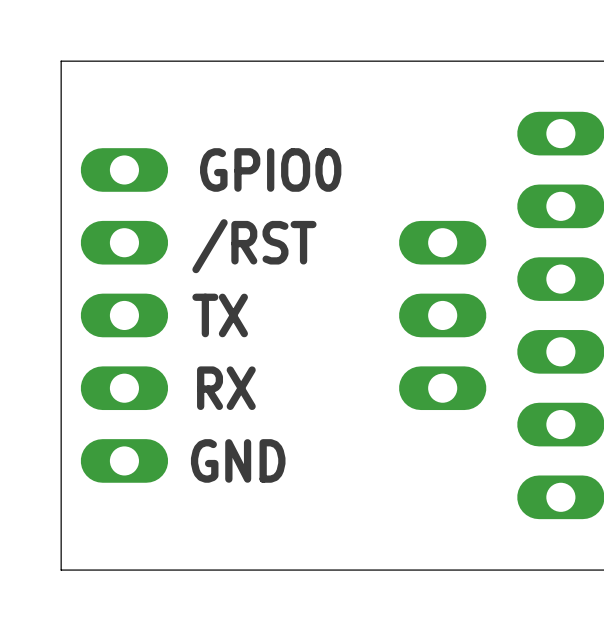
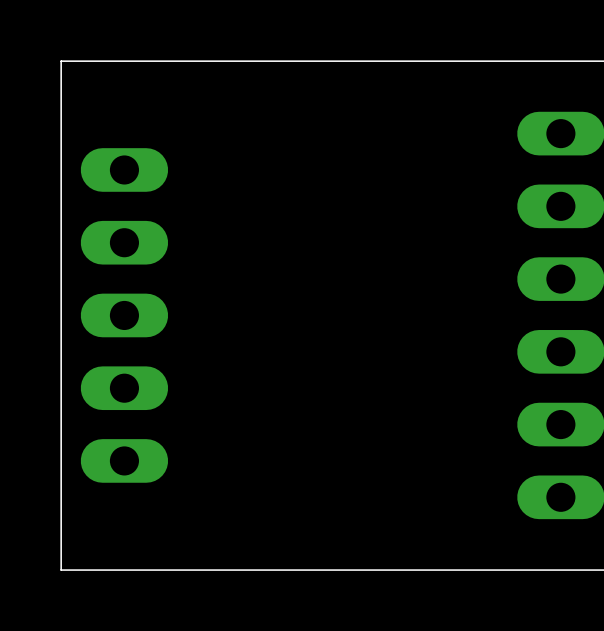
text: GPIO0 (270, 169) -> none
text: /RST (254, 246) -> none
text: TX (220, 315) -> none
part: (442, 315) -> none
text: RX (226, 388) -> none
text: GND (238, 460) -> none

